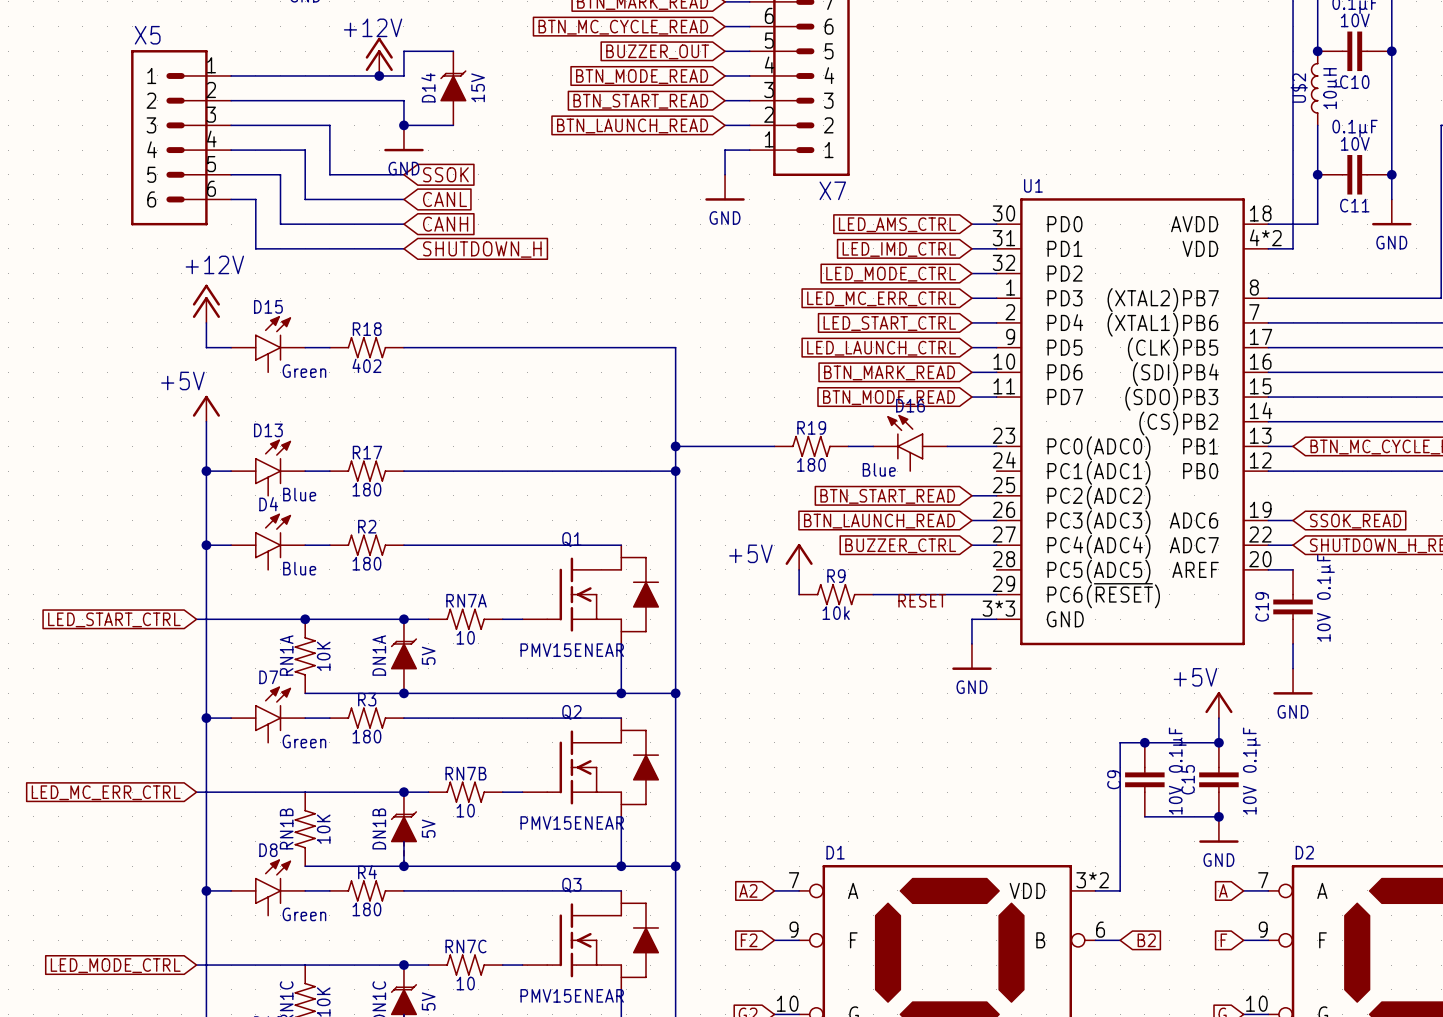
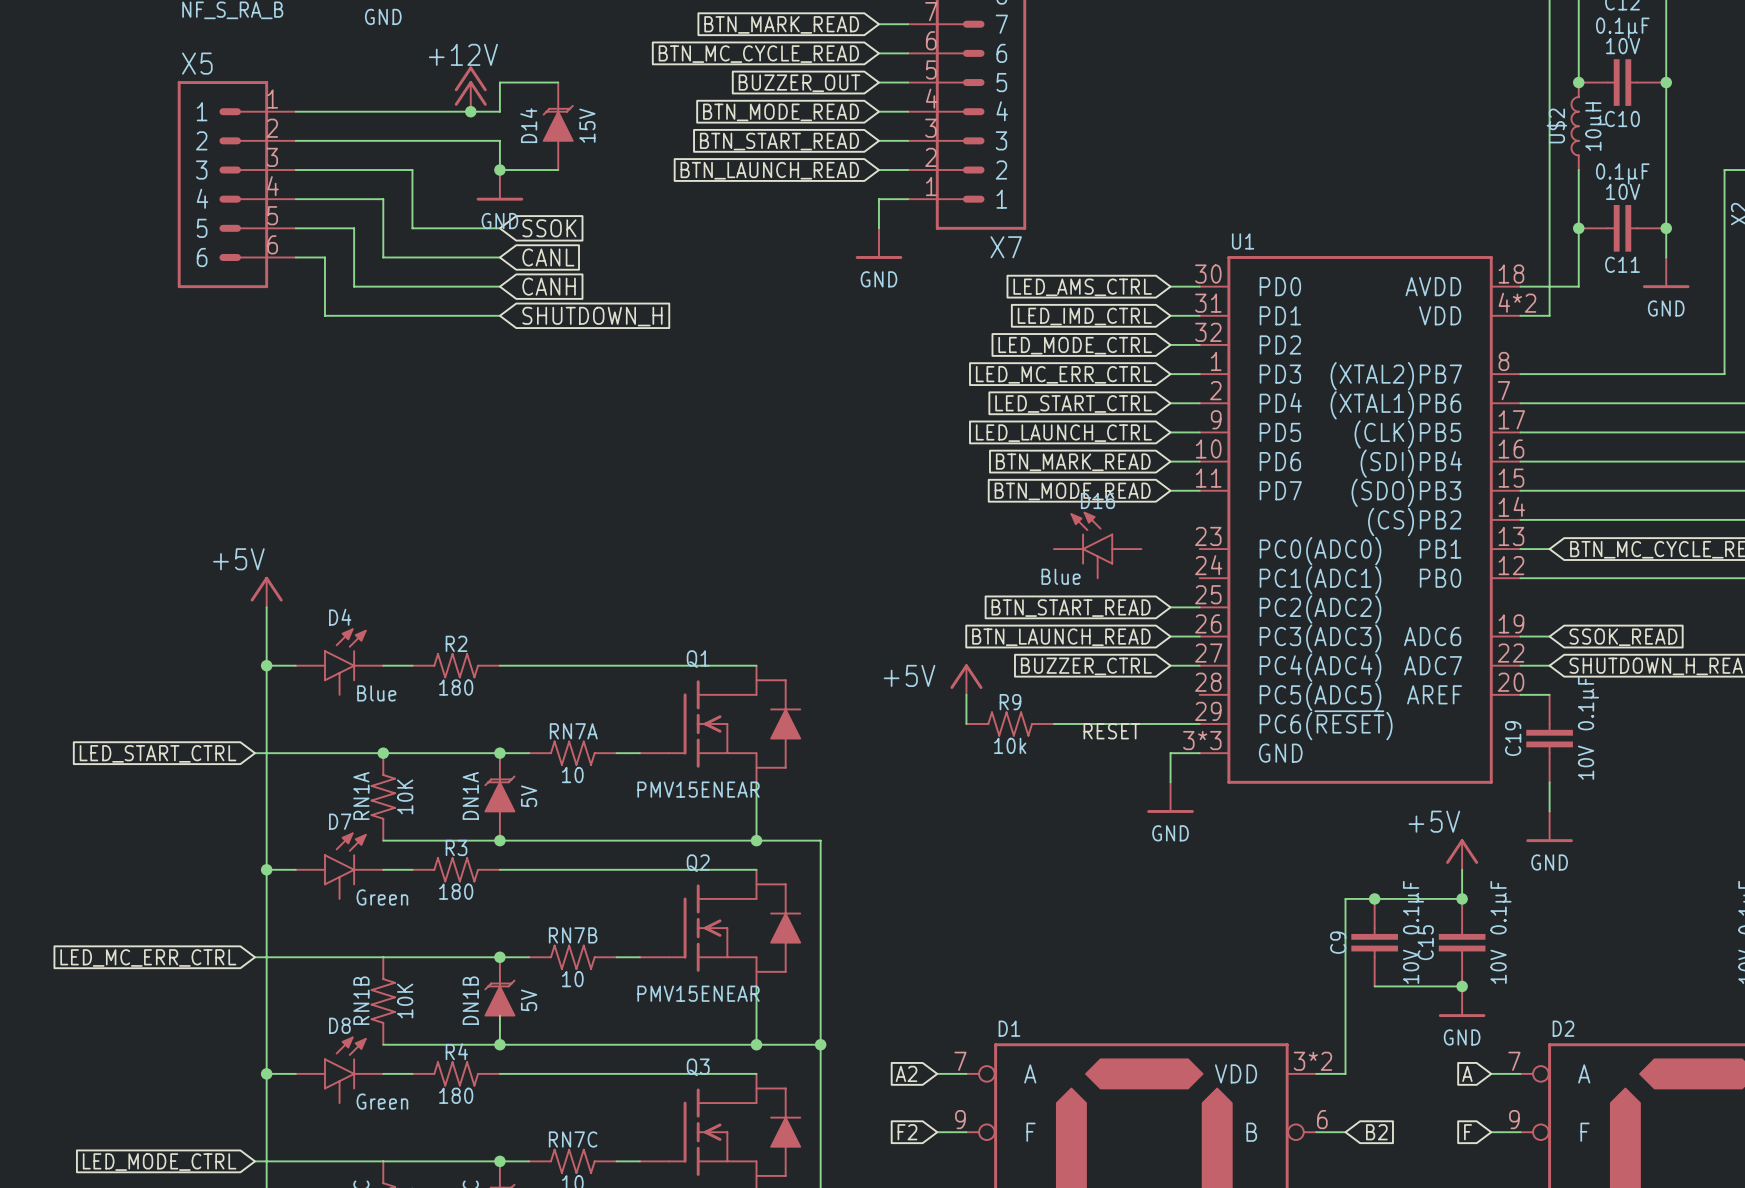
power symbol: +12V (206, 303) -> none
wire: (206, 322) (206, 347) (231, 347) -> none
D15: (268, 344) -> none
wire: (305, 347) (329, 347) -> none
R18: (366, 347) -> none
wire: (403, 347) (675, 347) (675, 693) -> none
power symbol position: +5V (206, 408) -> +5V (266, 592)
wire: (206, 421) (206, 495) -> none
wire: (675, 446) (774, 446) -> none
junction: (675, 446) -> none
R19: (811, 446) -> none
wire: (848, 446) (873, 446) -> none
wire: (947, 446) (996, 446) -> none
D13: (268, 468) -> none
wire: (206, 471) (231, 471) -> none
junction: (206, 471) -> none
wire: (305, 471) (329, 471) -> none
R17: (366, 471) -> none
wire: (403, 471) (675, 471) -> none
junction: (675, 471) -> none
junction: (675, 693) -> none

